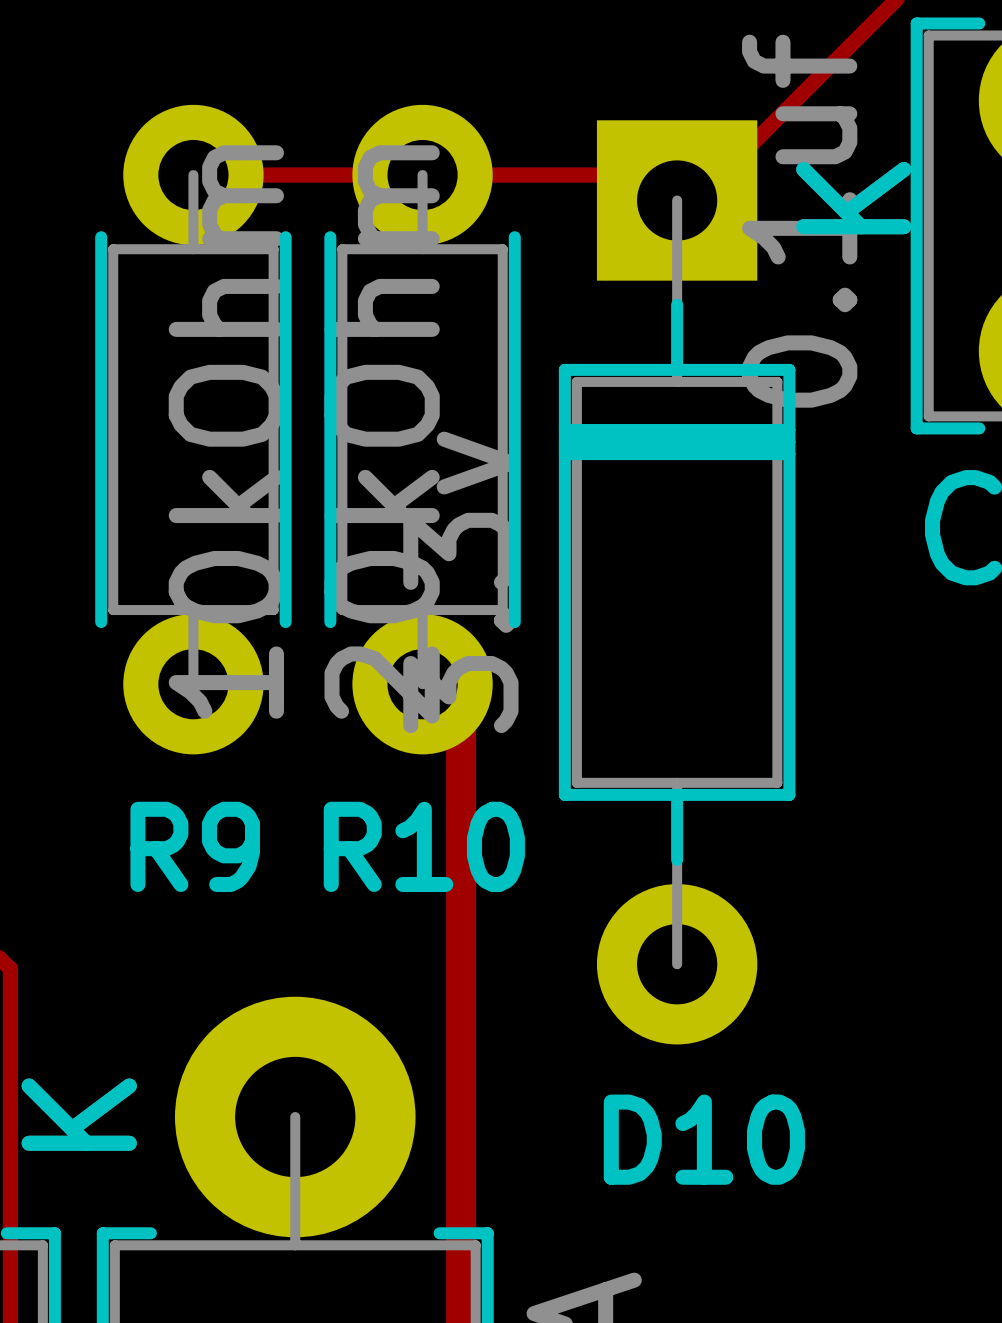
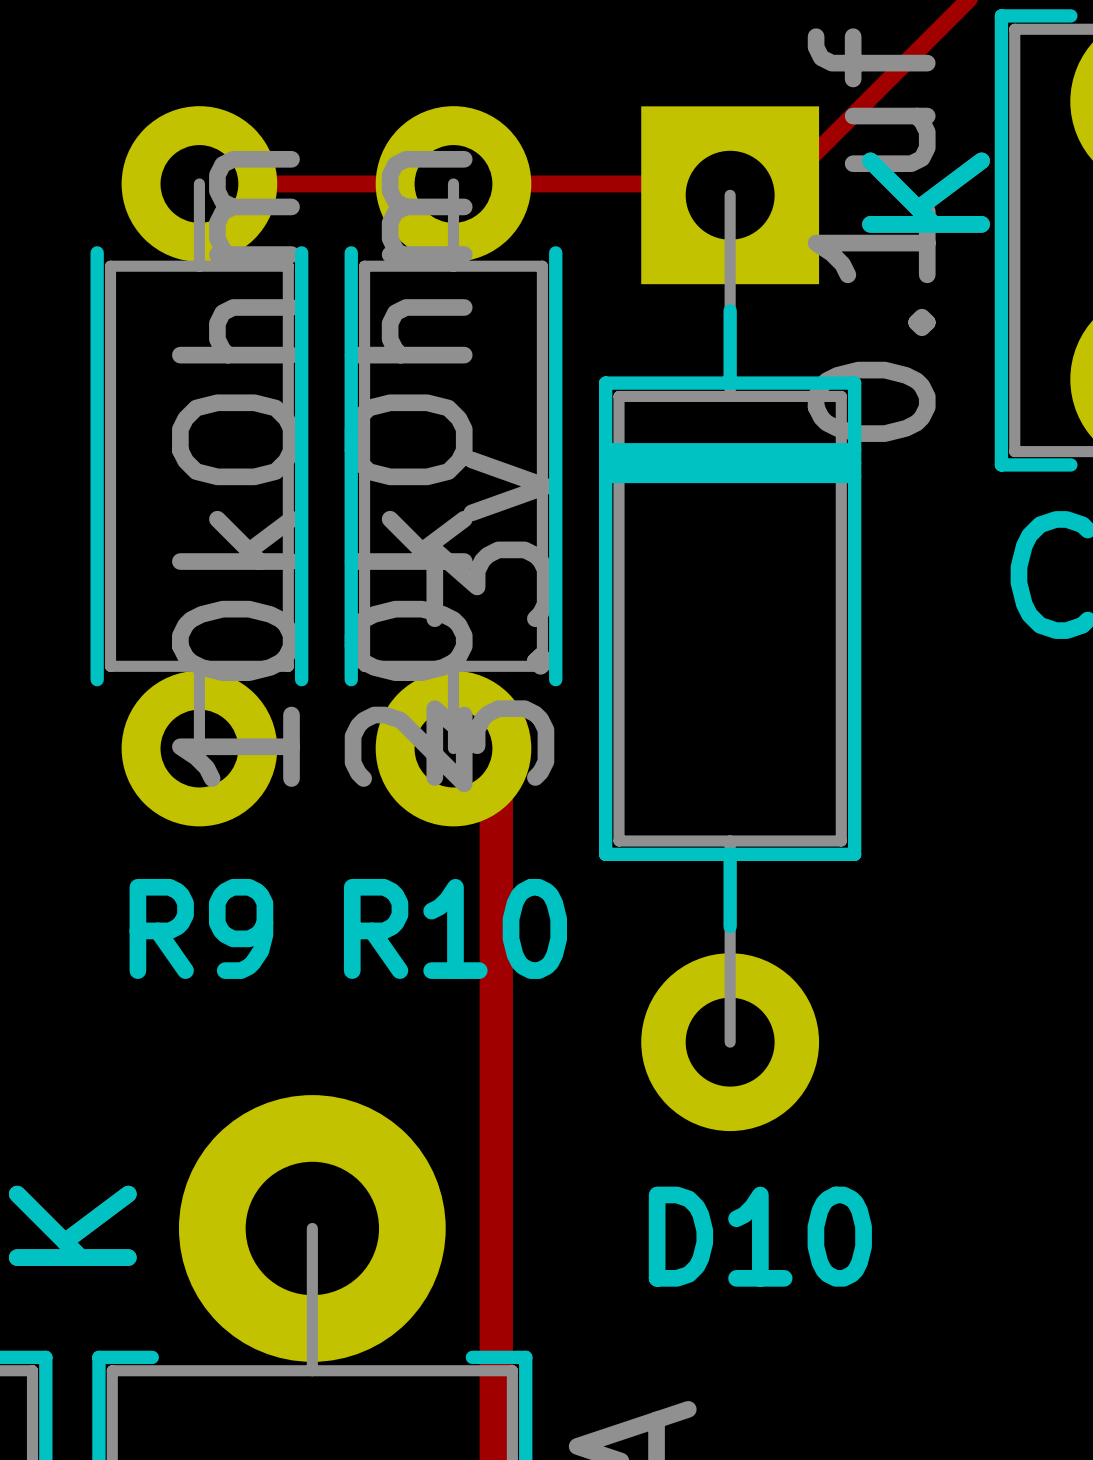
D10 position: (677, 582) -> (730, 618)

